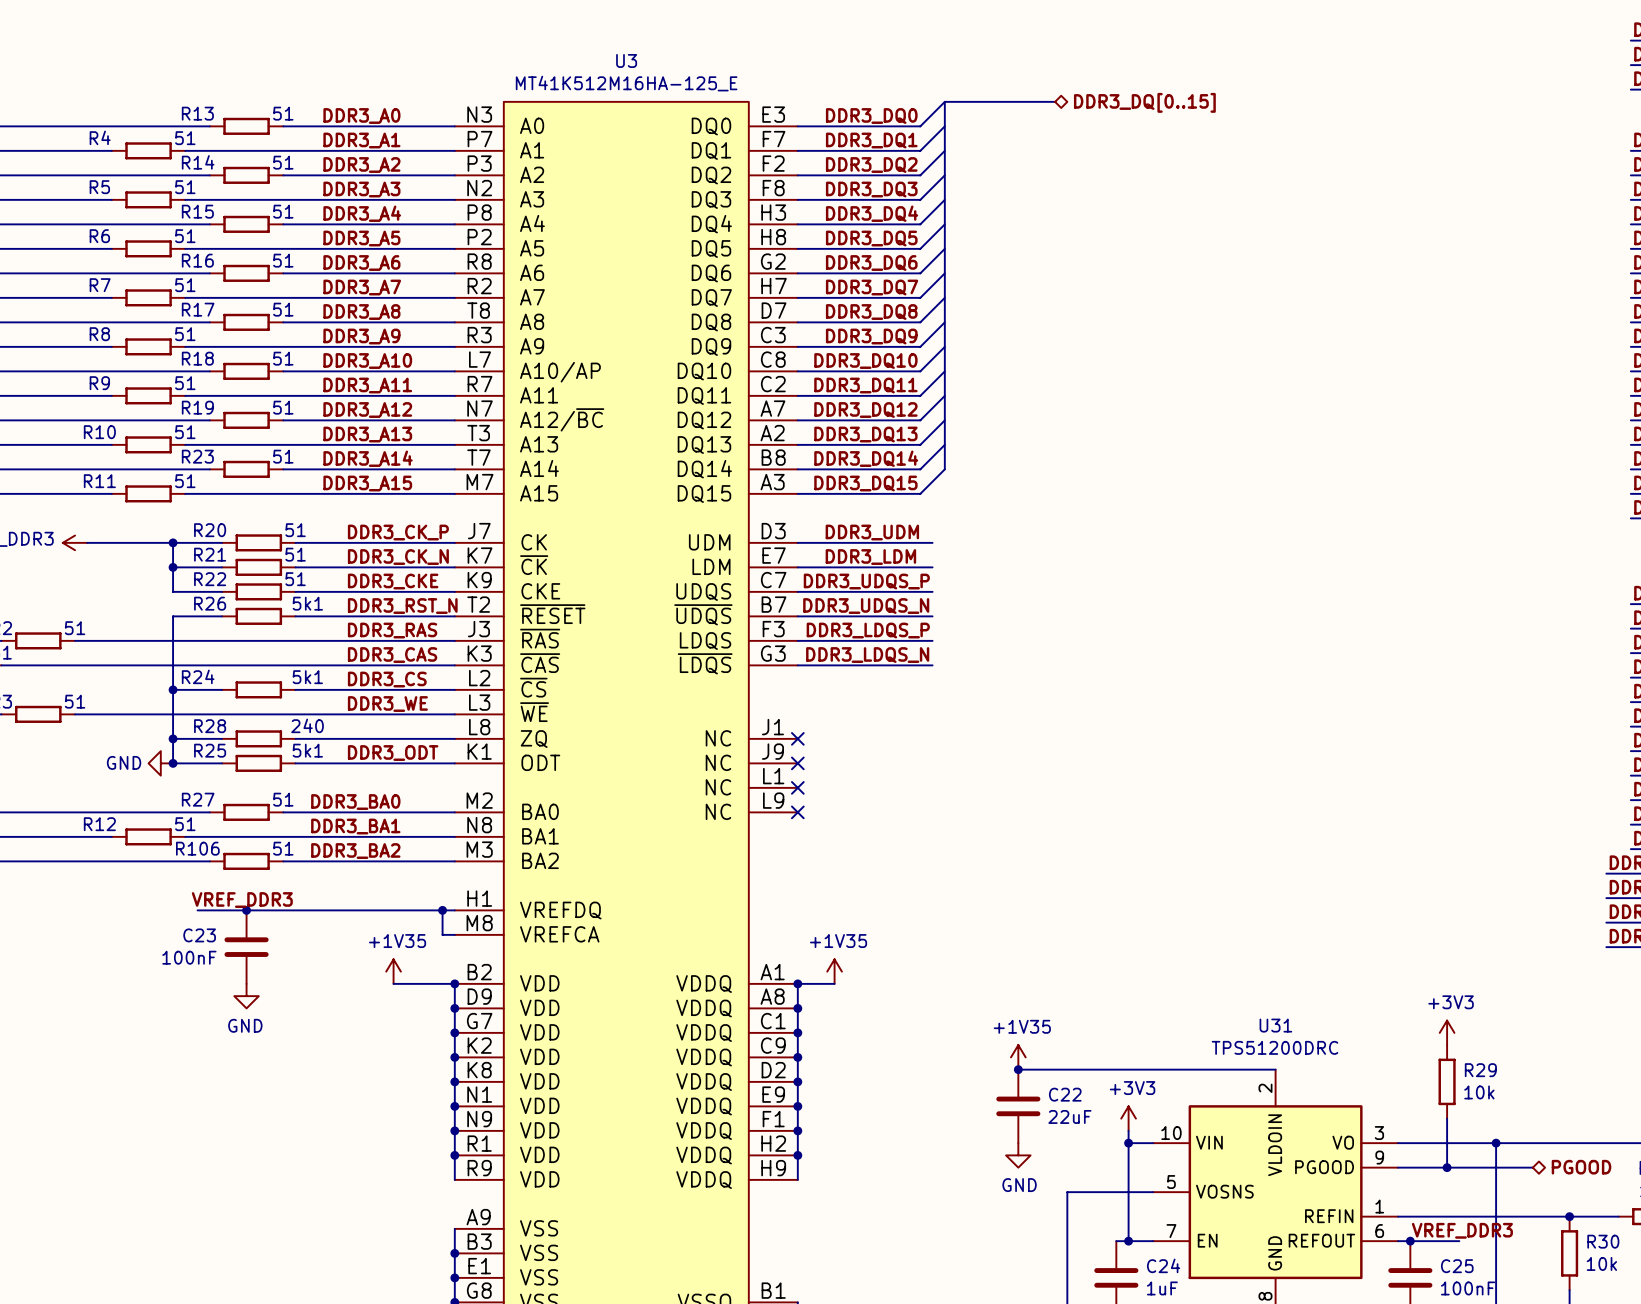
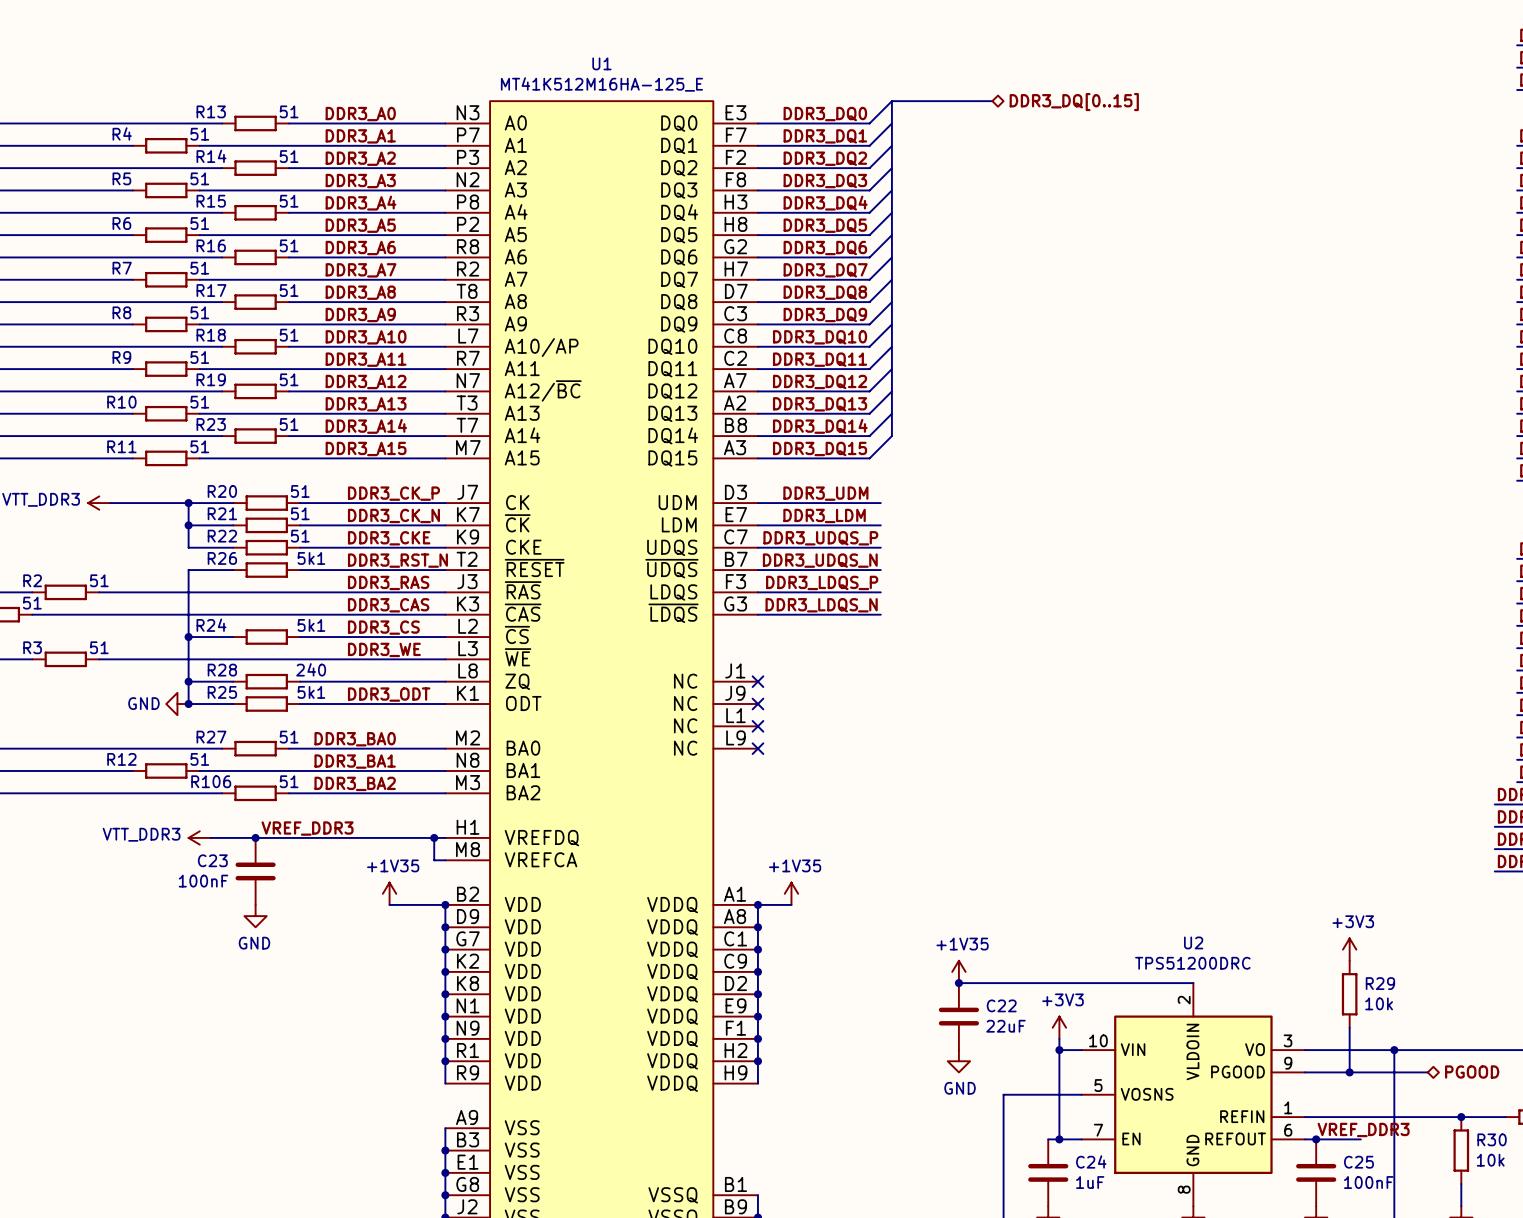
U3 name: U3 (626, 60) -> U1 (601, 63)
label position: VREF_DDR3 (242, 900) -> VREF_DDR3 (307, 828)
power symbol: none -> VTT_DDR3 (199, 837)
U31 name: U31 (1275, 1025) -> U2 (1193, 942)

